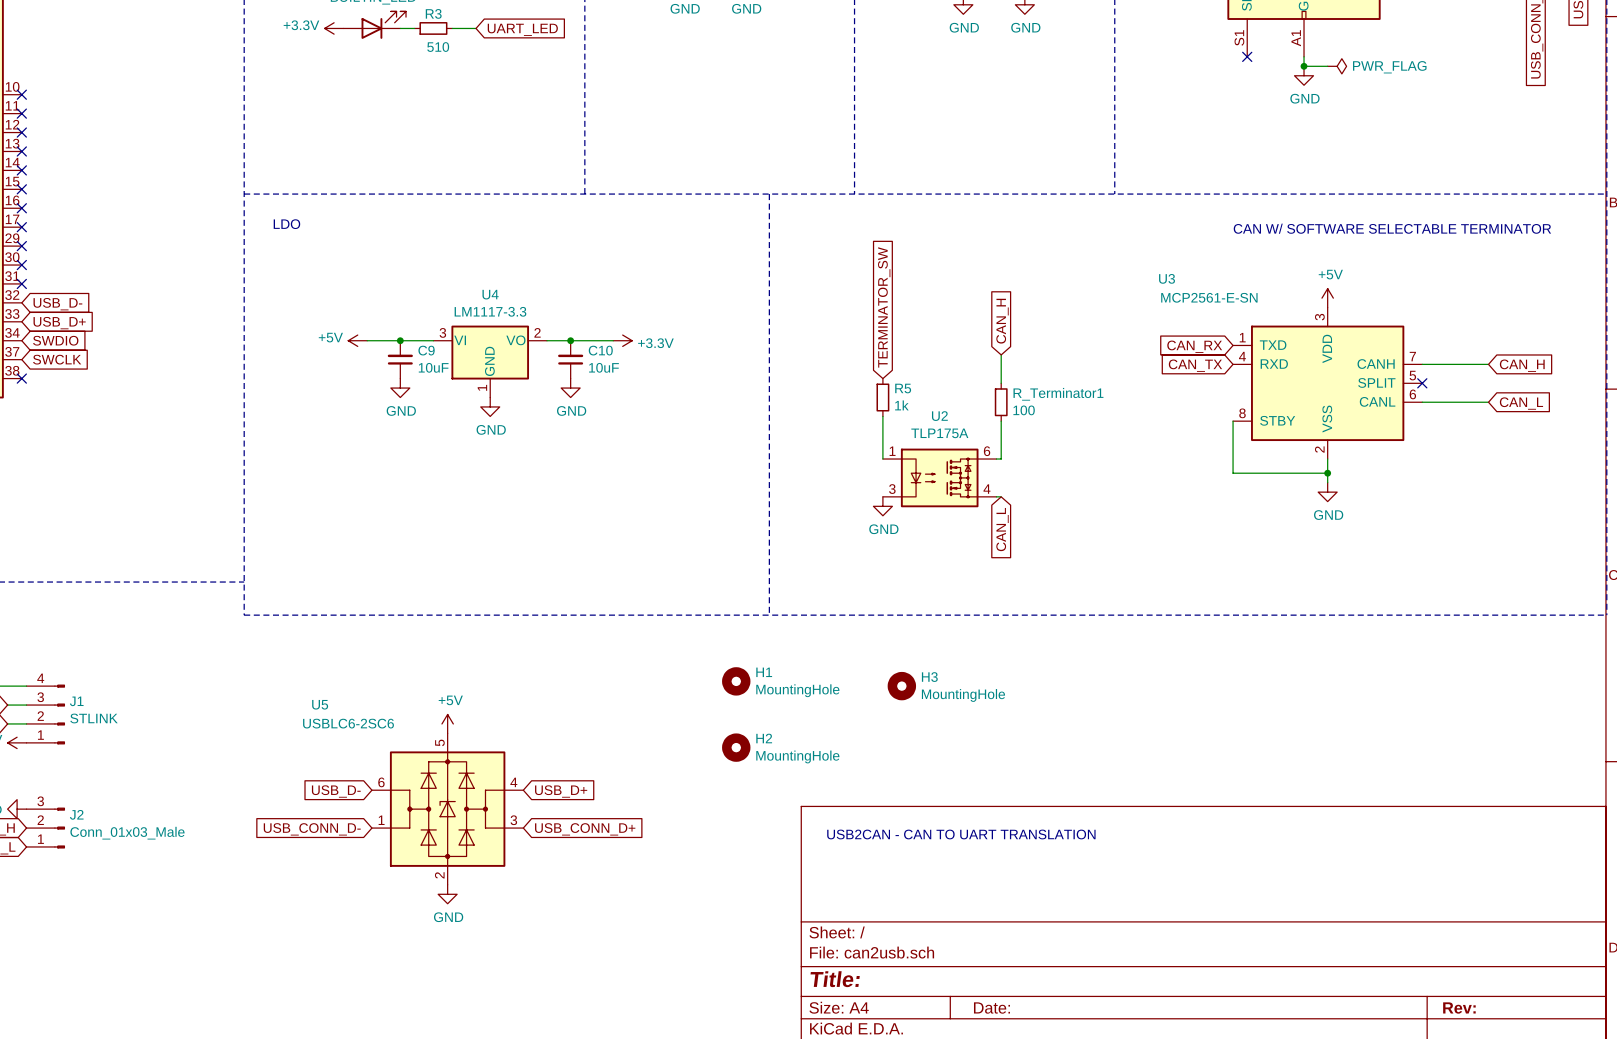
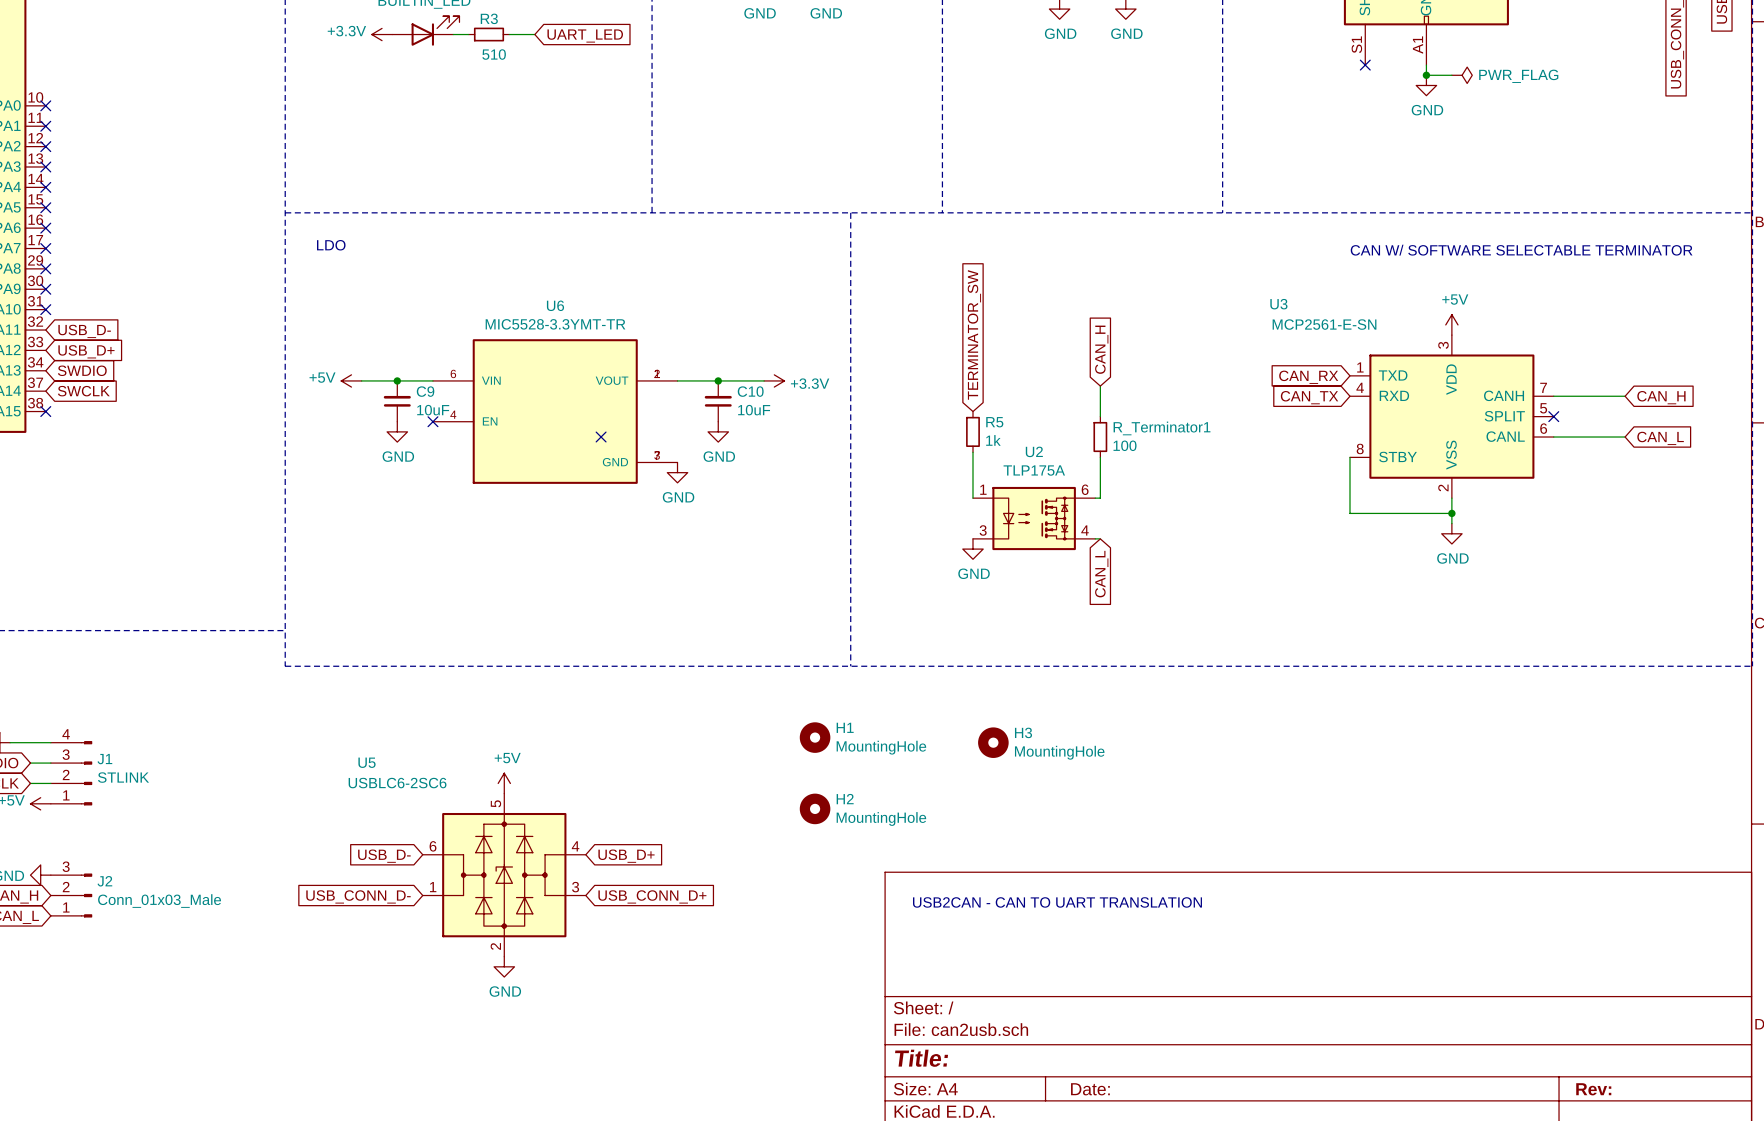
power symbol position: +5V (357, 340) -> +5V (351, 380)
wire: (367, 340) (433, 340) -> (361, 380) (432, 380)
junction: (400, 340) -> none
wire: (547, 340) (613, 340) -> none
junction: (570, 340) -> none
power symbol position: +3.3V (622, 340) -> +3.3V (774, 380)
junction: none -> (397, 380)
wire: none -> (677, 380) (764, 380)
junction: none -> (718, 380)
C9 position: (400, 359) -> (397, 401)
C10 position: (570, 359) -> (718, 401)
U4: LM1117-3.3 (490, 361) -> none
U6: none -> MIC5528-3.3YMT-TR (555, 411)
no-connect mark: none -> (432, 421)
power symbol position: GND (400, 388) -> GND (397, 431)
power symbol: GND (570, 388) -> none
power symbol: none -> GND (718, 431)
no-connect mark: none -> (601, 437)
power symbol: GND (490, 406) -> none
power symbol: none -> GND (677, 472)

